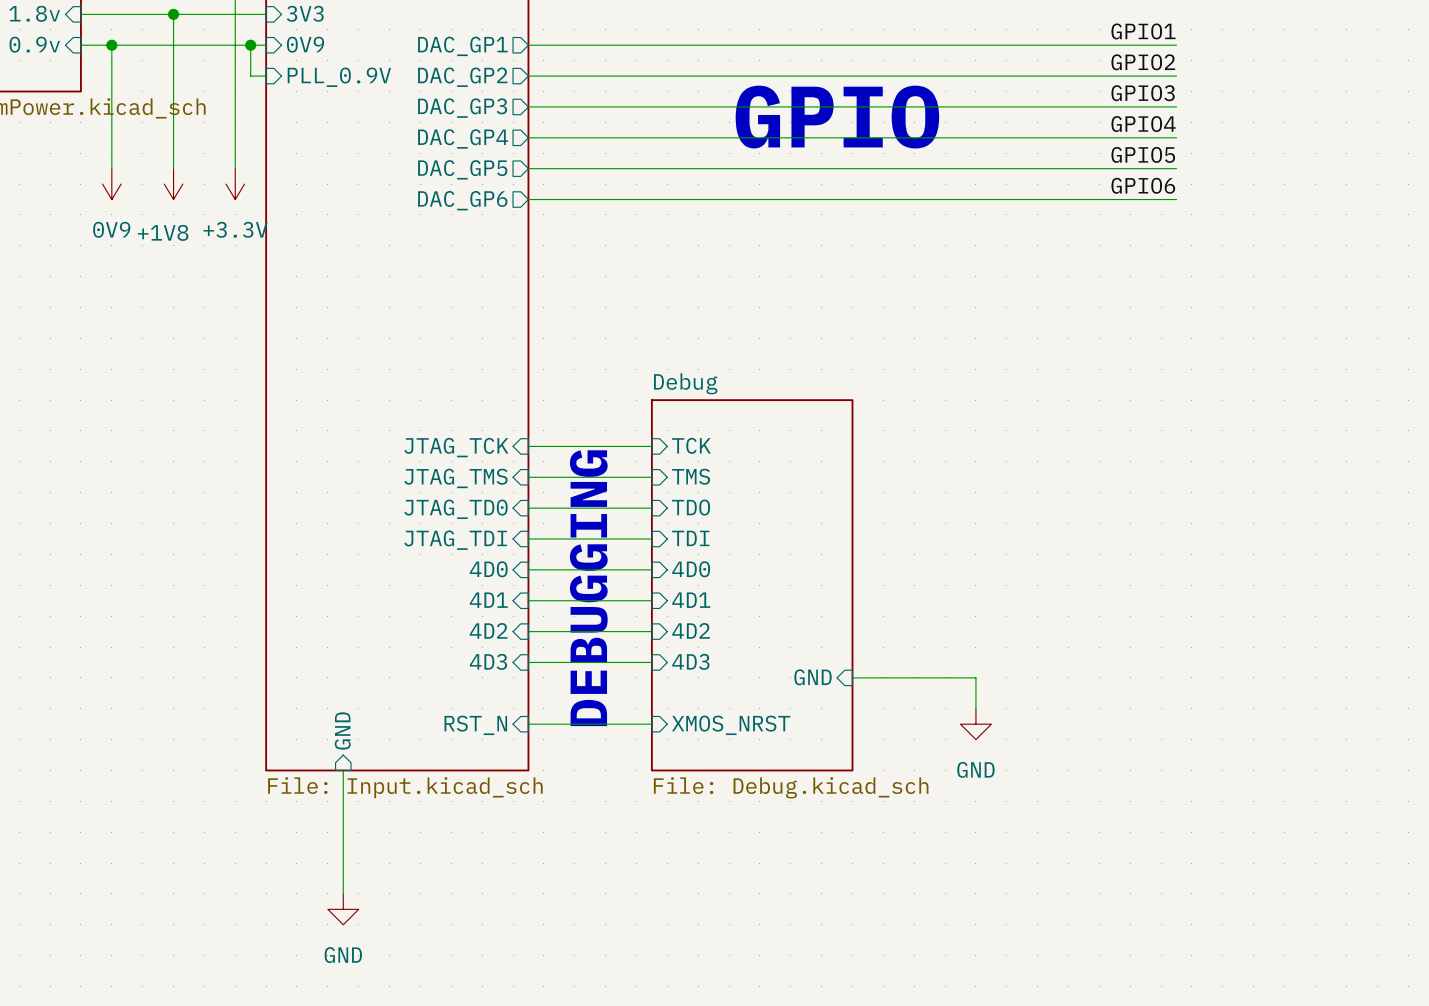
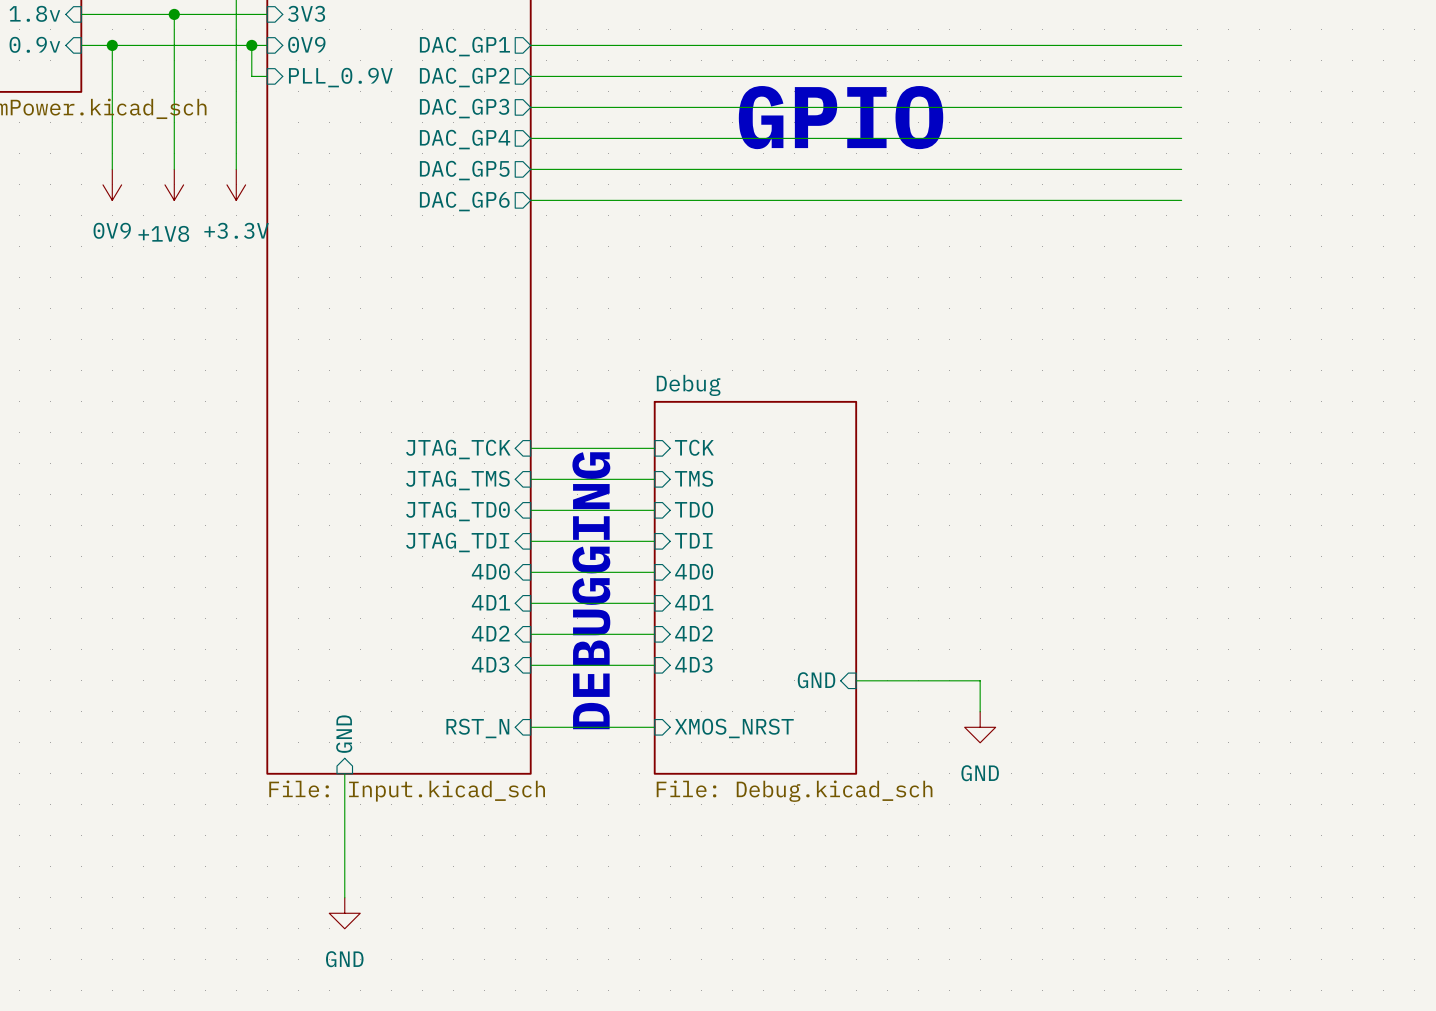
label: GPIO1 (1143, 31) -> none
label: GPIO2 (1143, 62) -> none
label: GPIO3 (1143, 93) -> none
label: GPIO4 (1143, 124) -> none
label: GPIO5 (1143, 154) -> none
label: GPIO6 (1143, 185) -> none

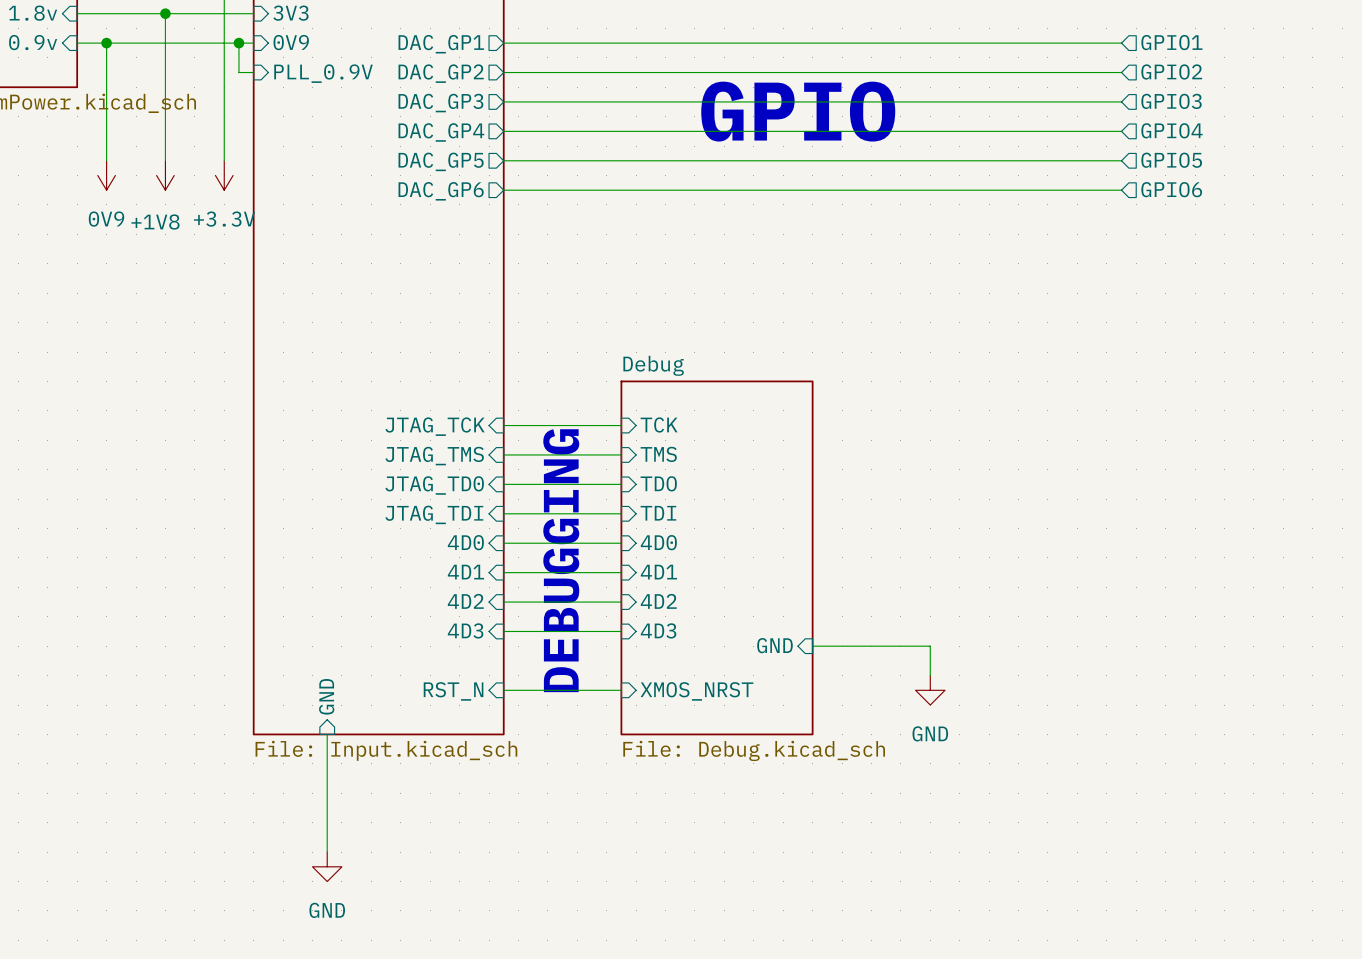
sheet pin: none -> GPIO1 (1171, 42)
sheet pin: none -> GPIO2 (1171, 71)
sheet pin: none -> GPIO3 (1171, 101)
sheet pin: none -> GPIO4 (1171, 130)
sheet pin: none -> GPIO5 (1171, 160)
sheet pin: none -> GPIO6 (1171, 189)

